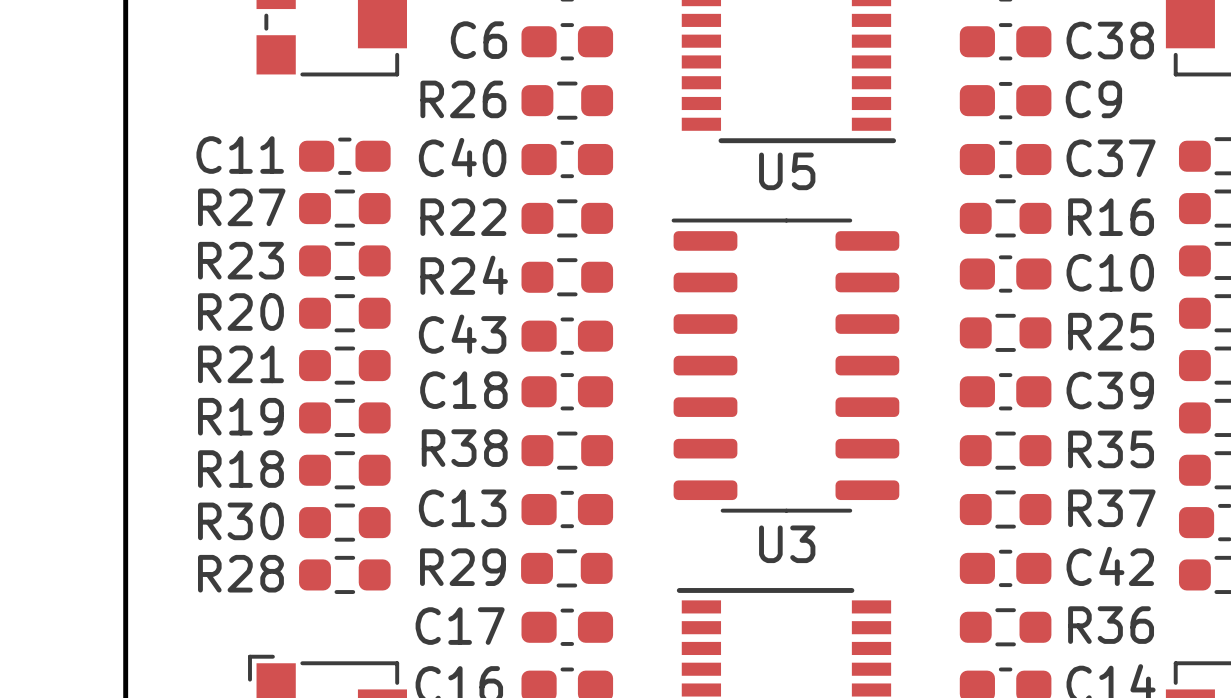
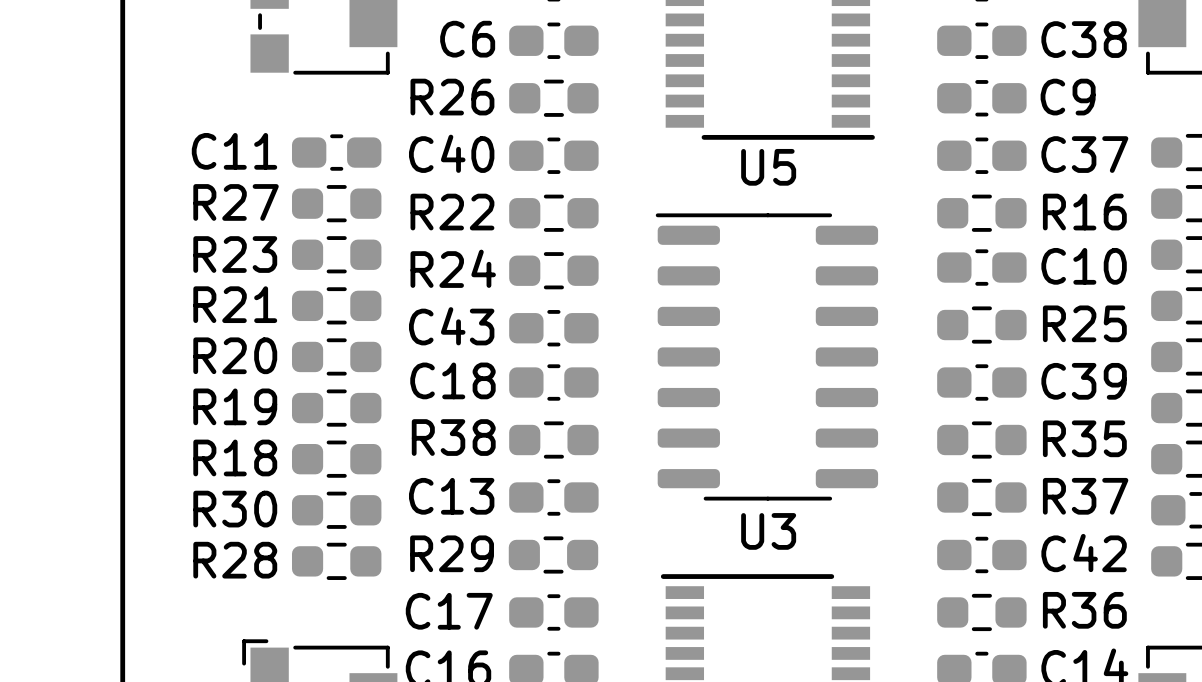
R20 name: R20 (240, 312) -> R21 (235, 304)
R21 name: R21 (240, 364) -> R20 (235, 355)

